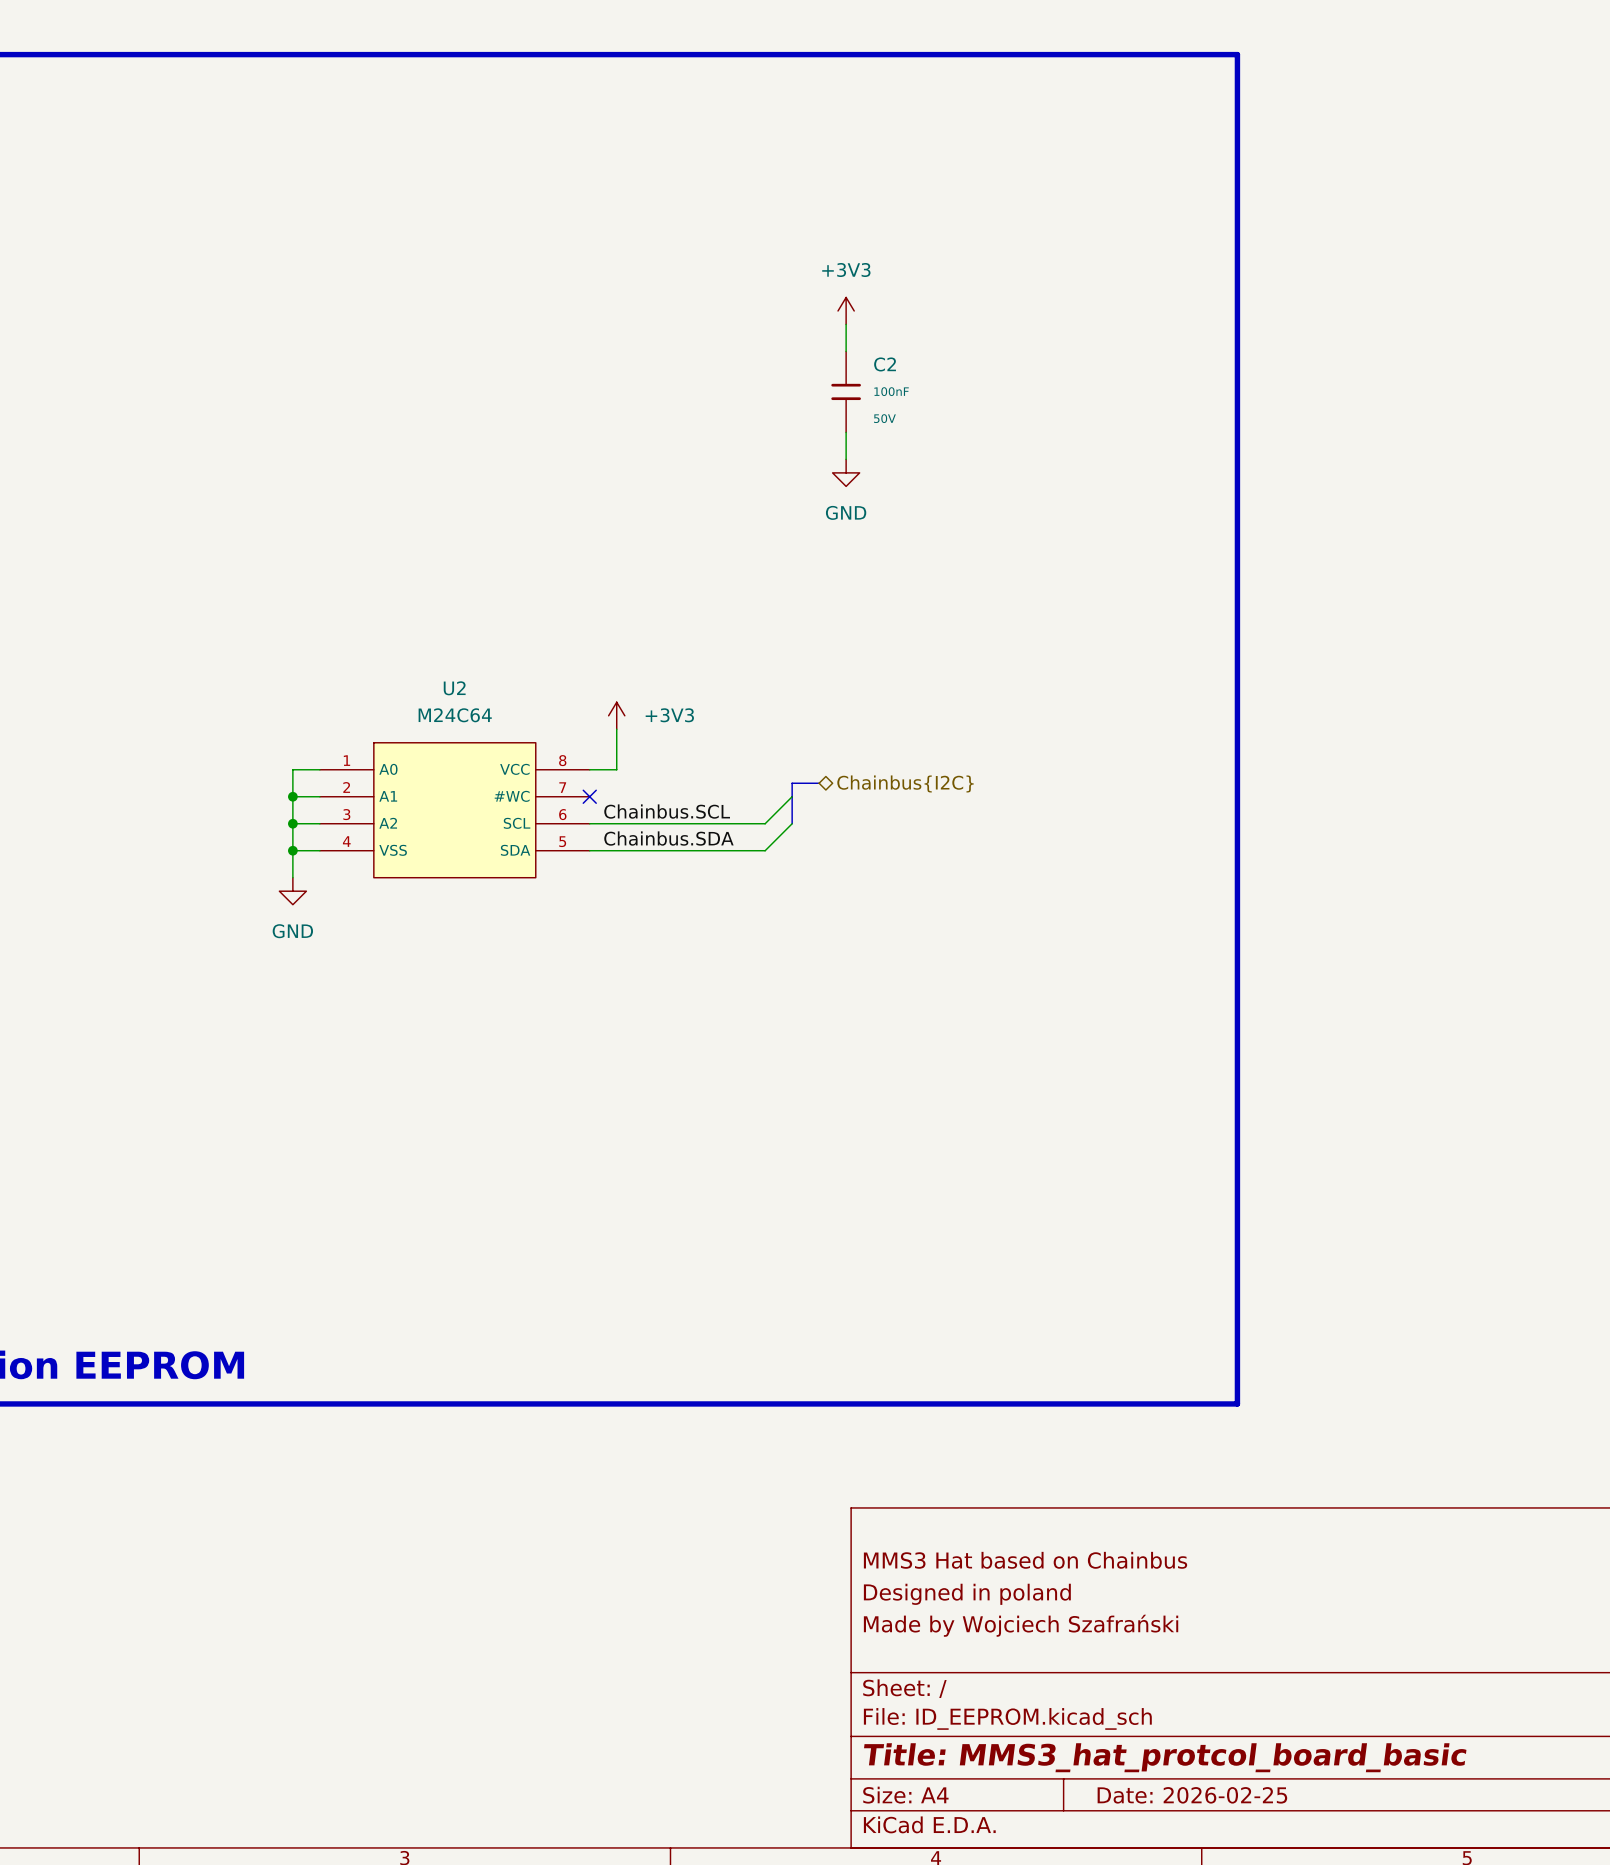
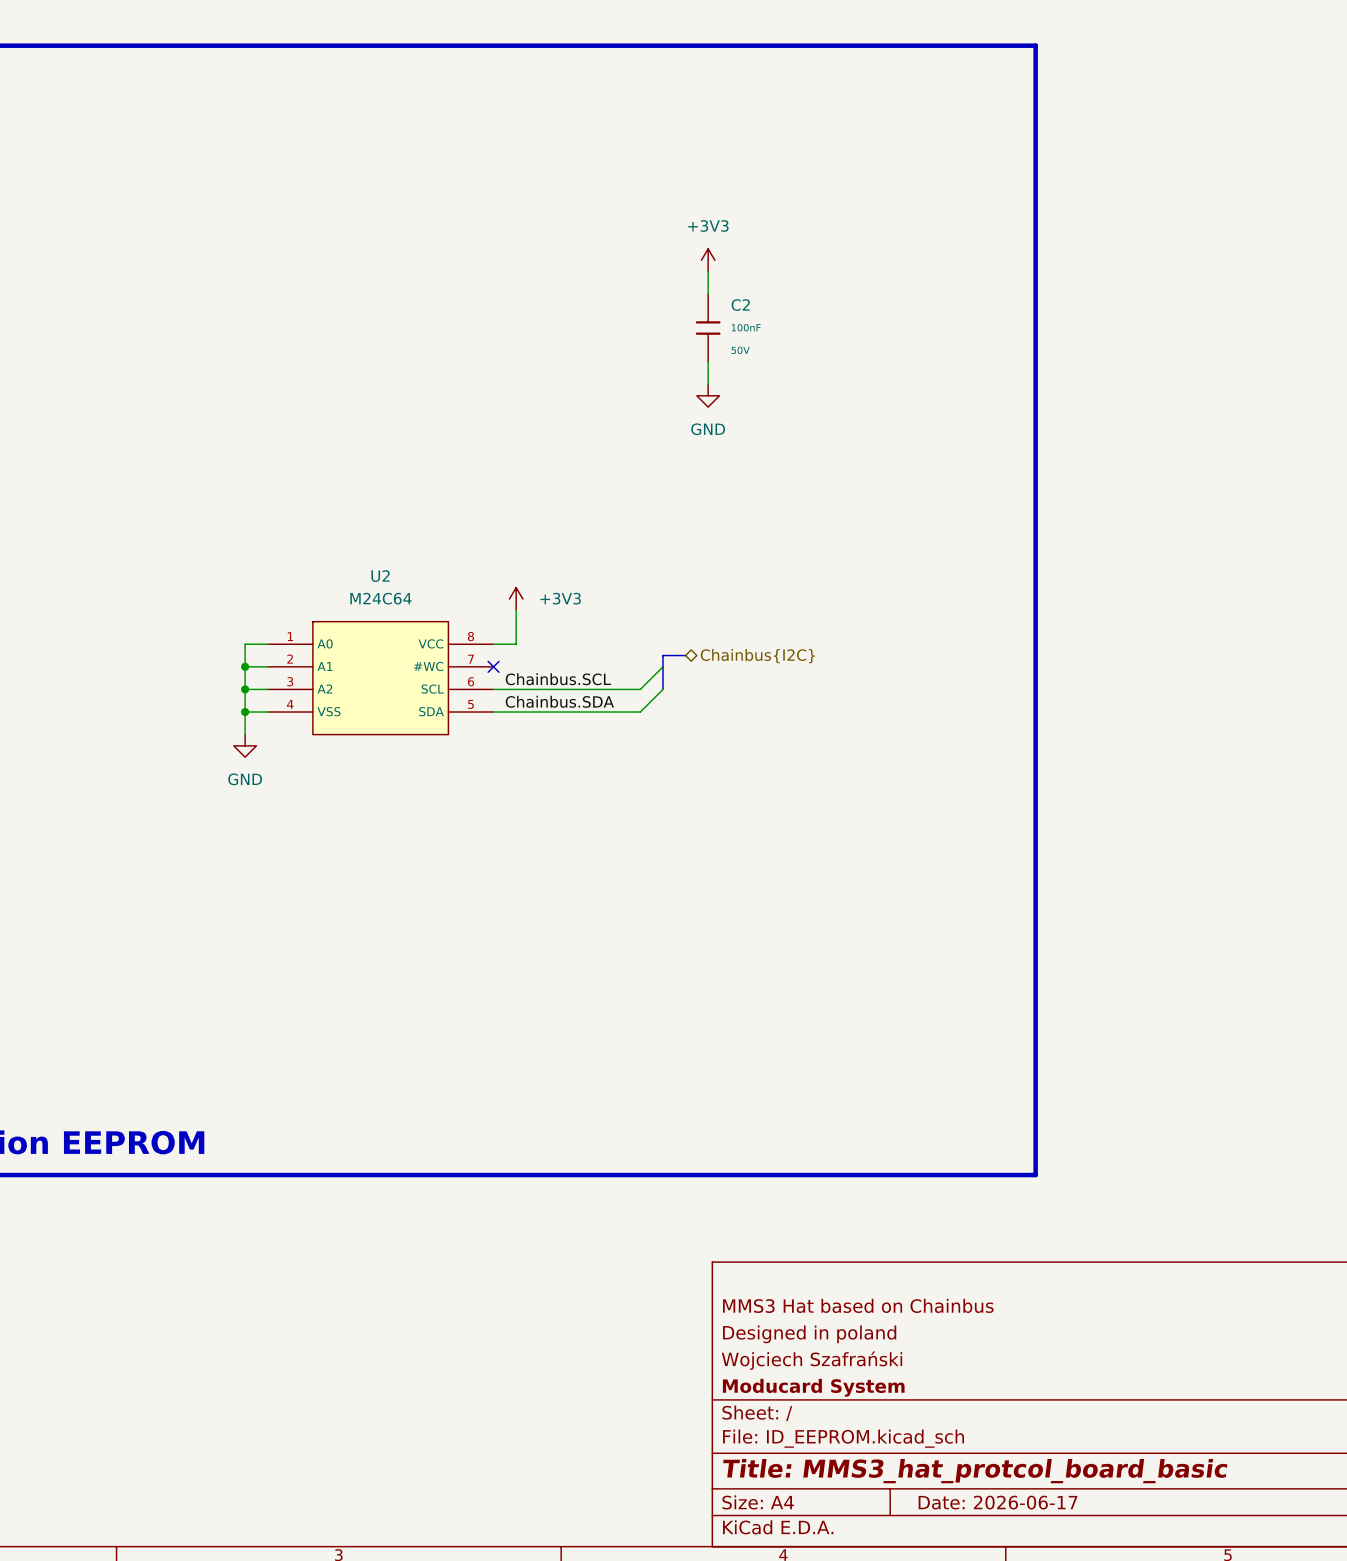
title block: Made by Wojciech Szafrański (1021, 1625) -> Wojciech Szafrański (811, 1360)
title block: none -> Moducard System (813, 1387)
title block: Date: 2026-02-25 (1192, 1795) -> Date: 2026-06-17 (997, 1502)

